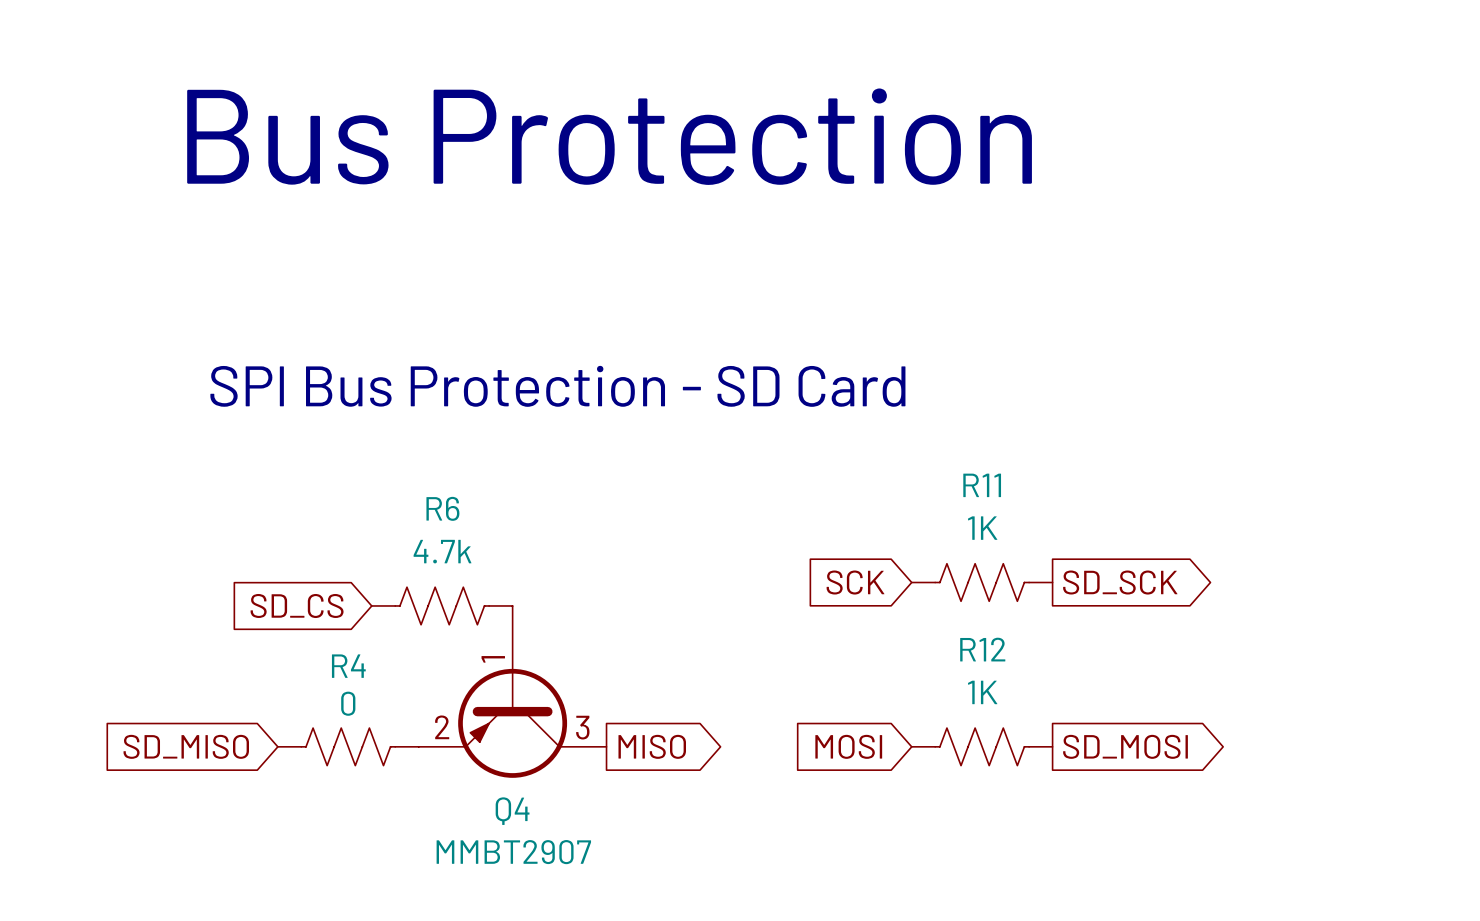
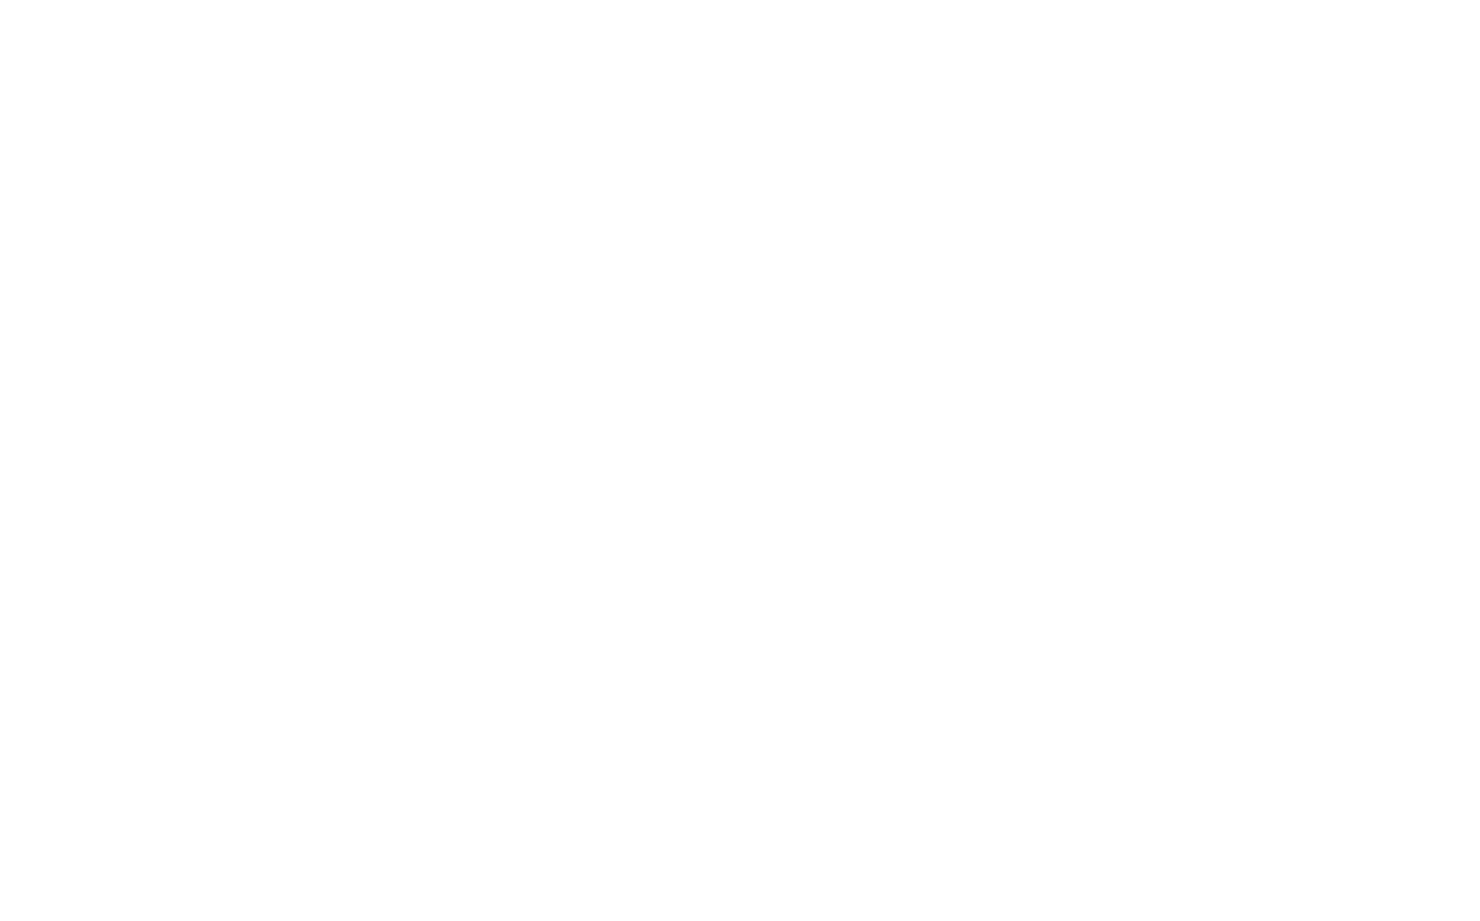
text: Bus Protection (609, 136) -> none
text: SPI Bus Protection - SD Card (557, 386) -> none
global label: SCK (855, 582) -> none
R11: 1K (982, 582) -> none
global label: SD_SCK (1120, 582) -> none
R6: 4.7k (442, 605) -> none
global label: SD_CS (297, 606) -> none
Q4: MMBT2907 (512, 691) -> none
global label: SD_MISO (186, 746) -> none
R4: 0 (348, 746) -> none
global label: MISO (652, 746) -> none
global label: MOSI (848, 746) -> none
R12: 1K (982, 746) -> none
global label: SD_MOSI (1125, 746) -> none

